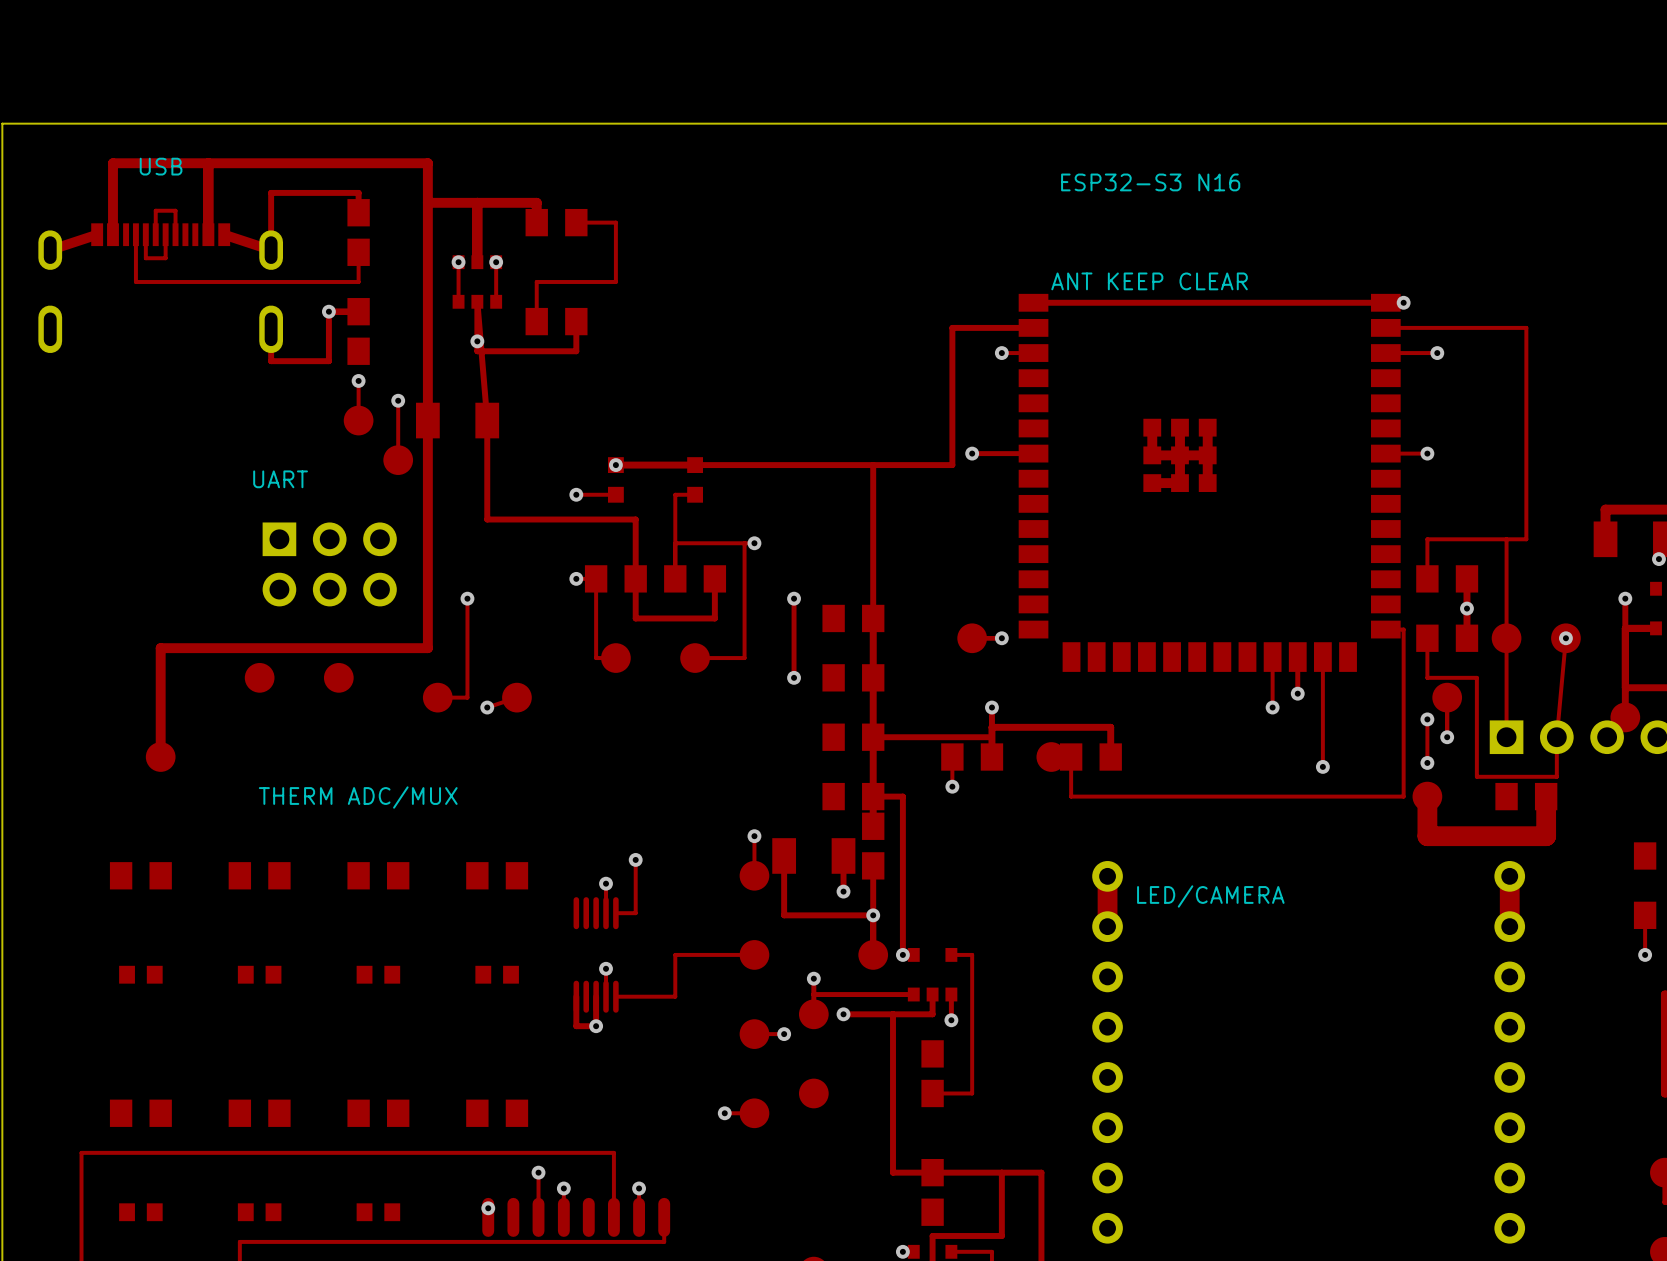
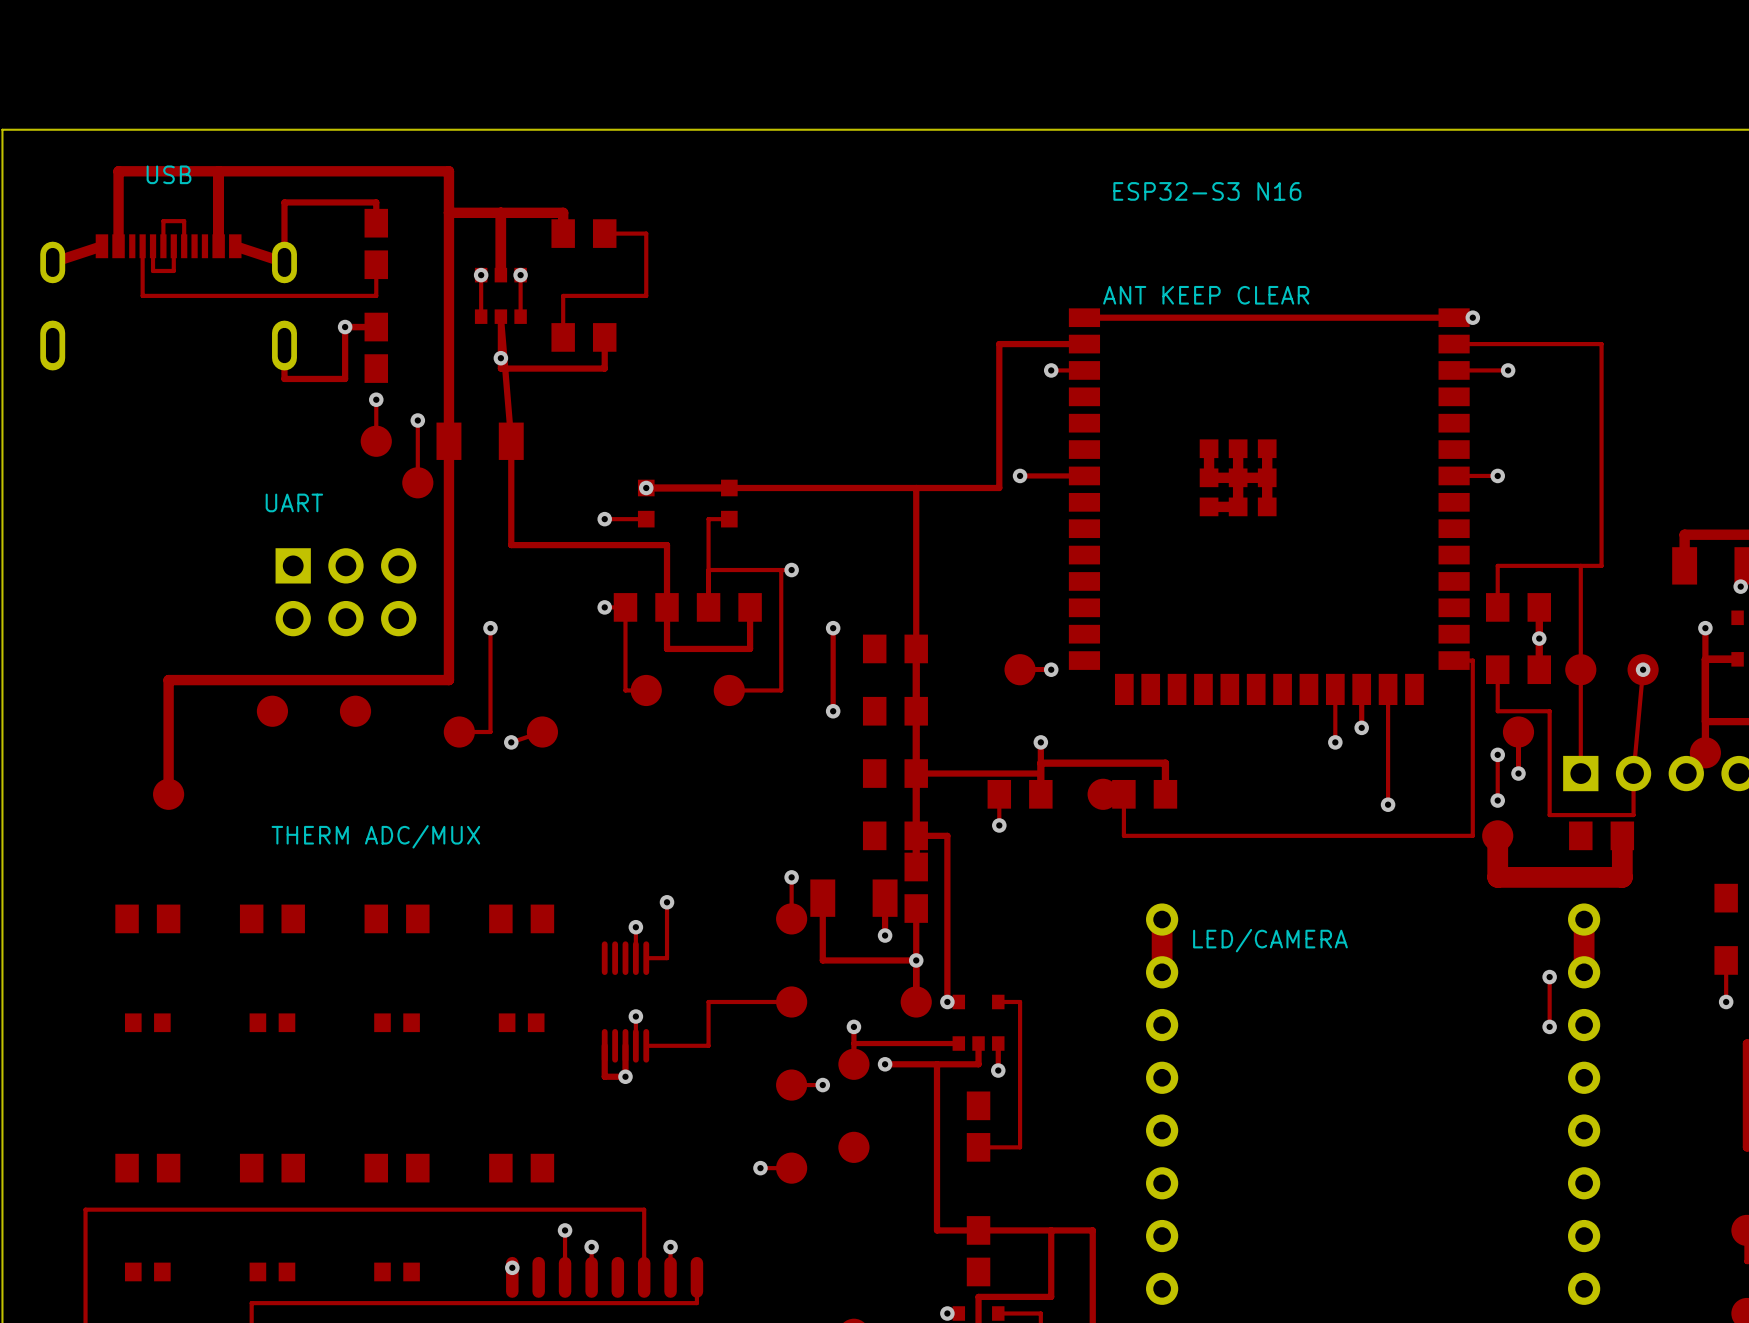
track: none -> (1549, 977) (1549, 1026)
via: none -> (1549, 977)
via: none -> (1549, 1026)

